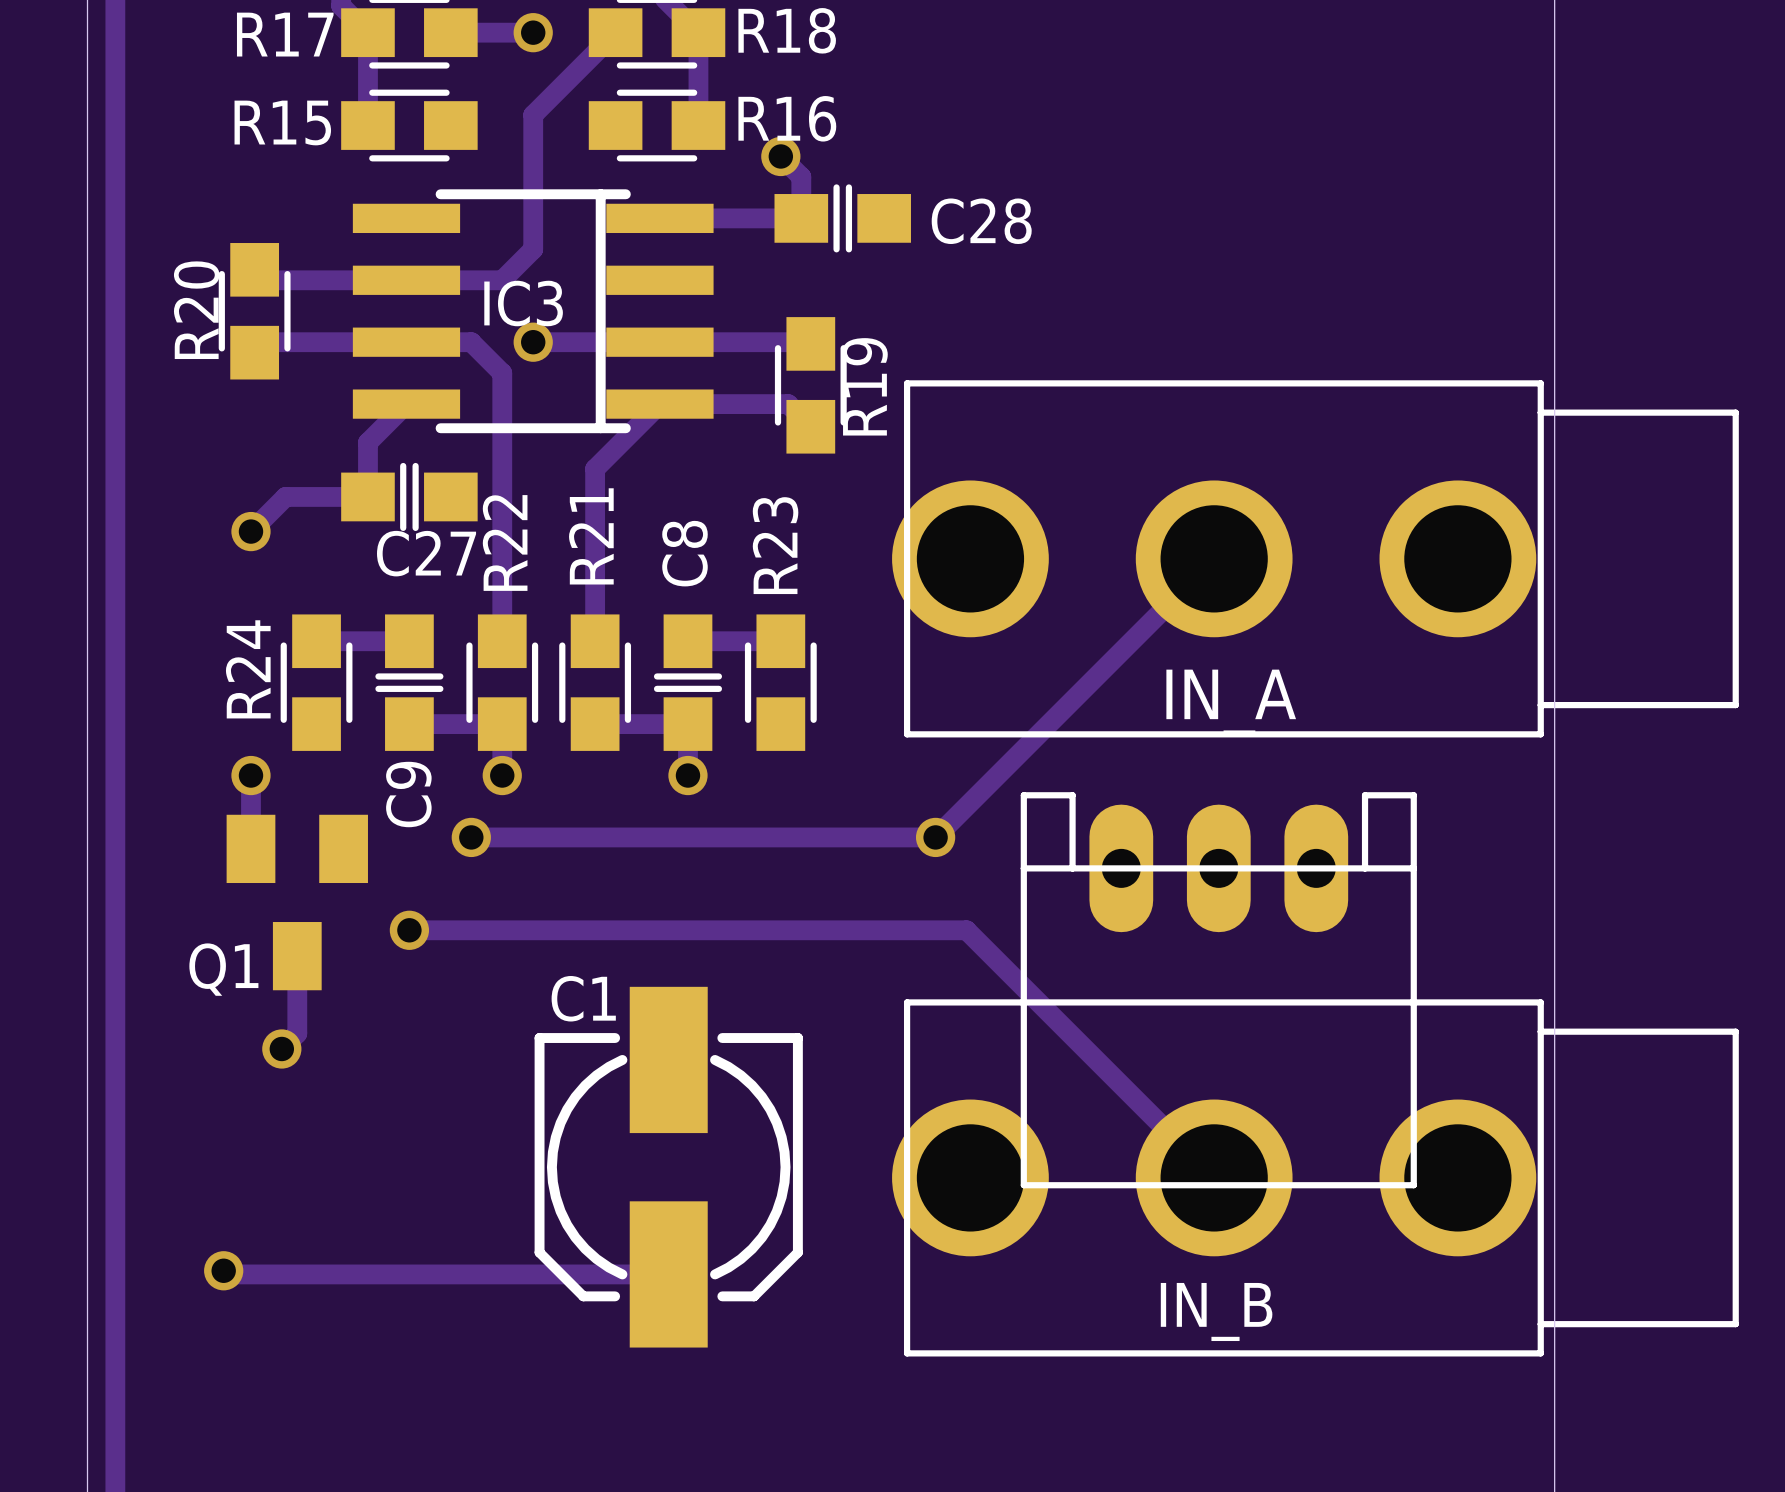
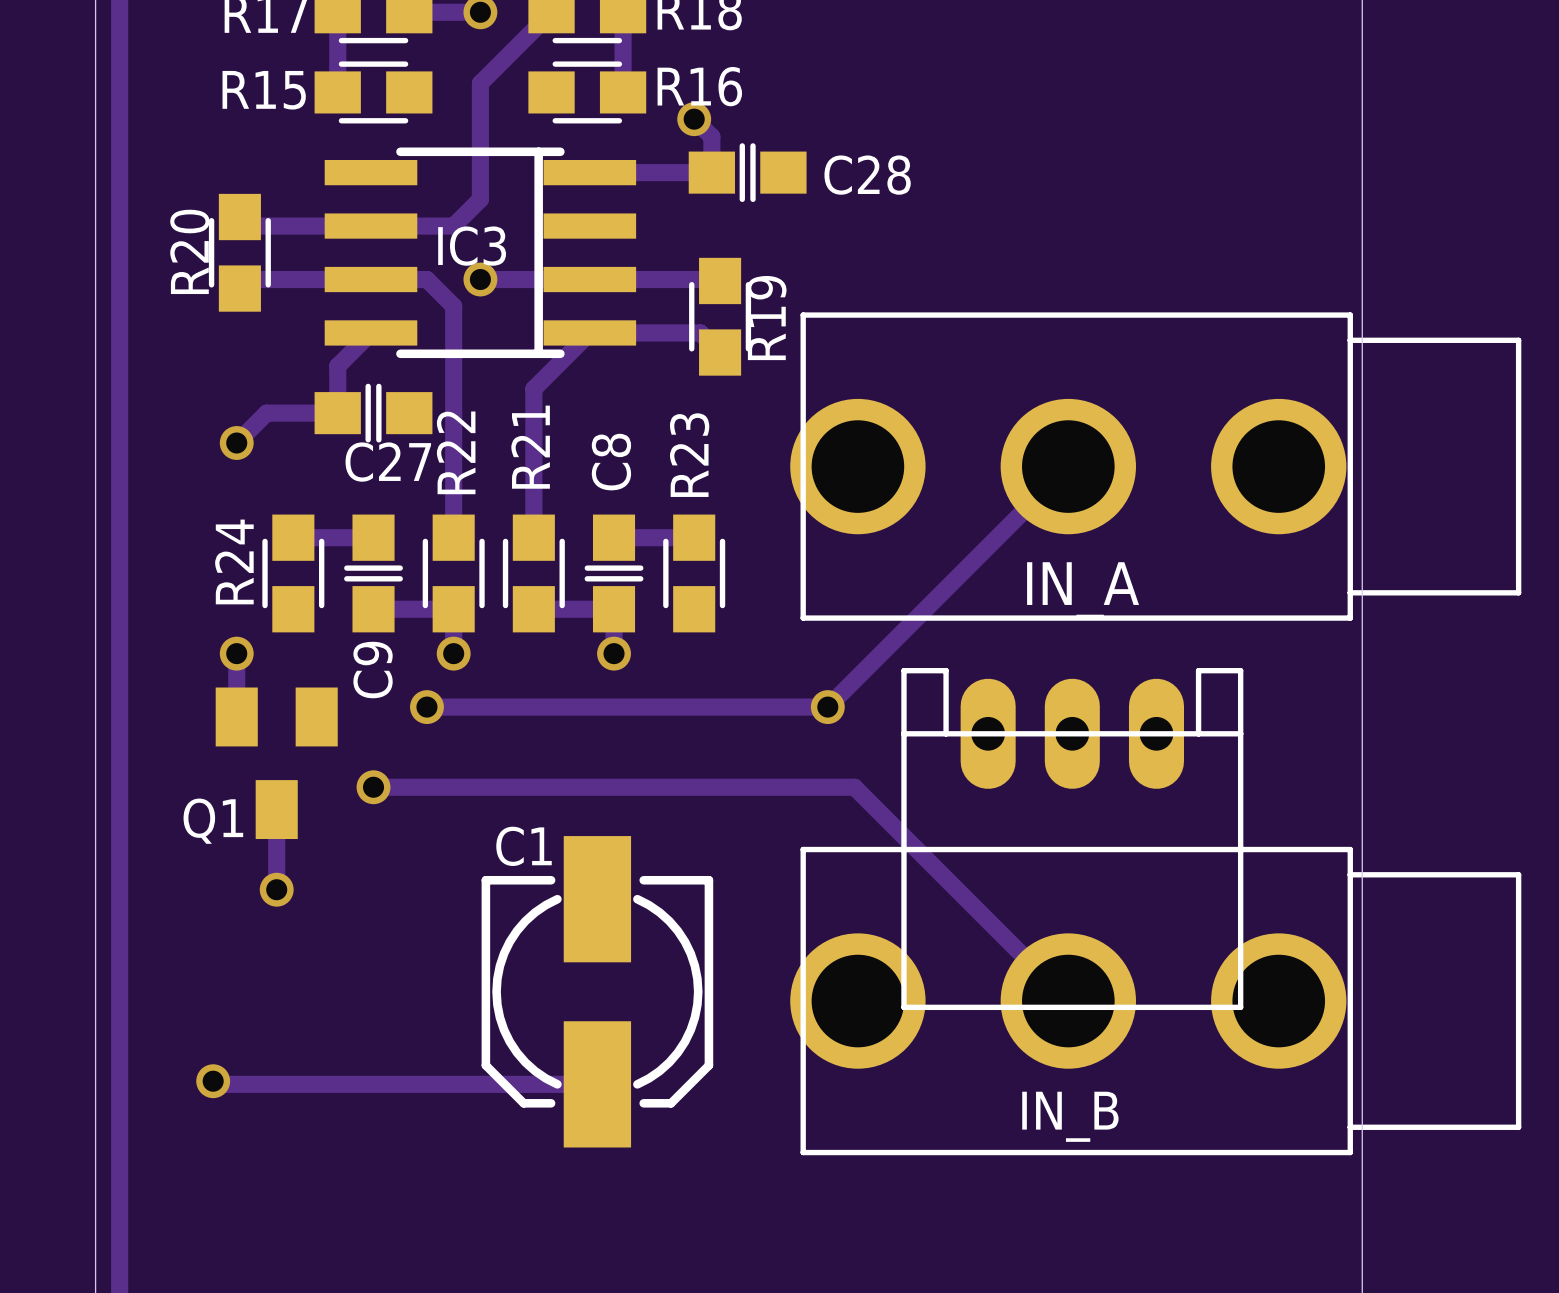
via position: (281, 1048) -> (276, 889)

